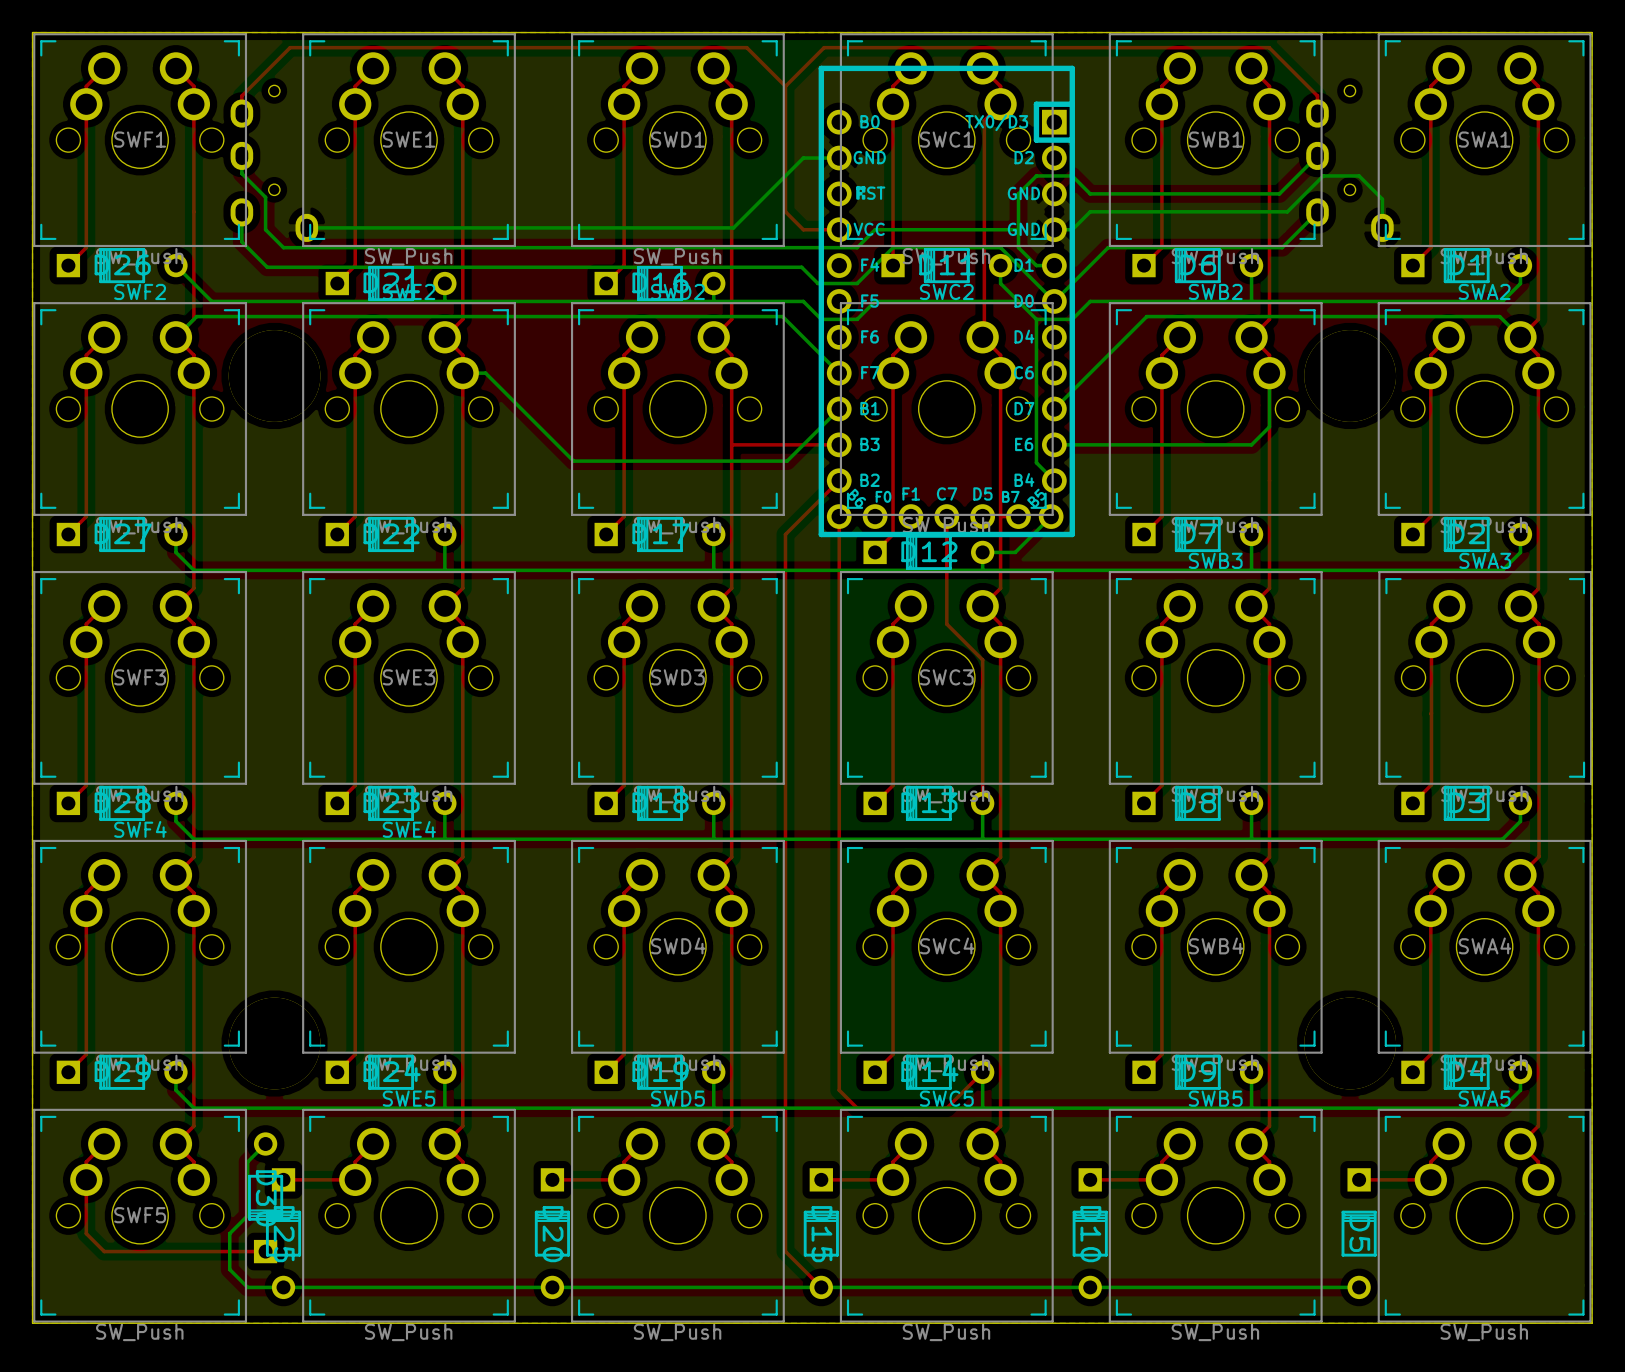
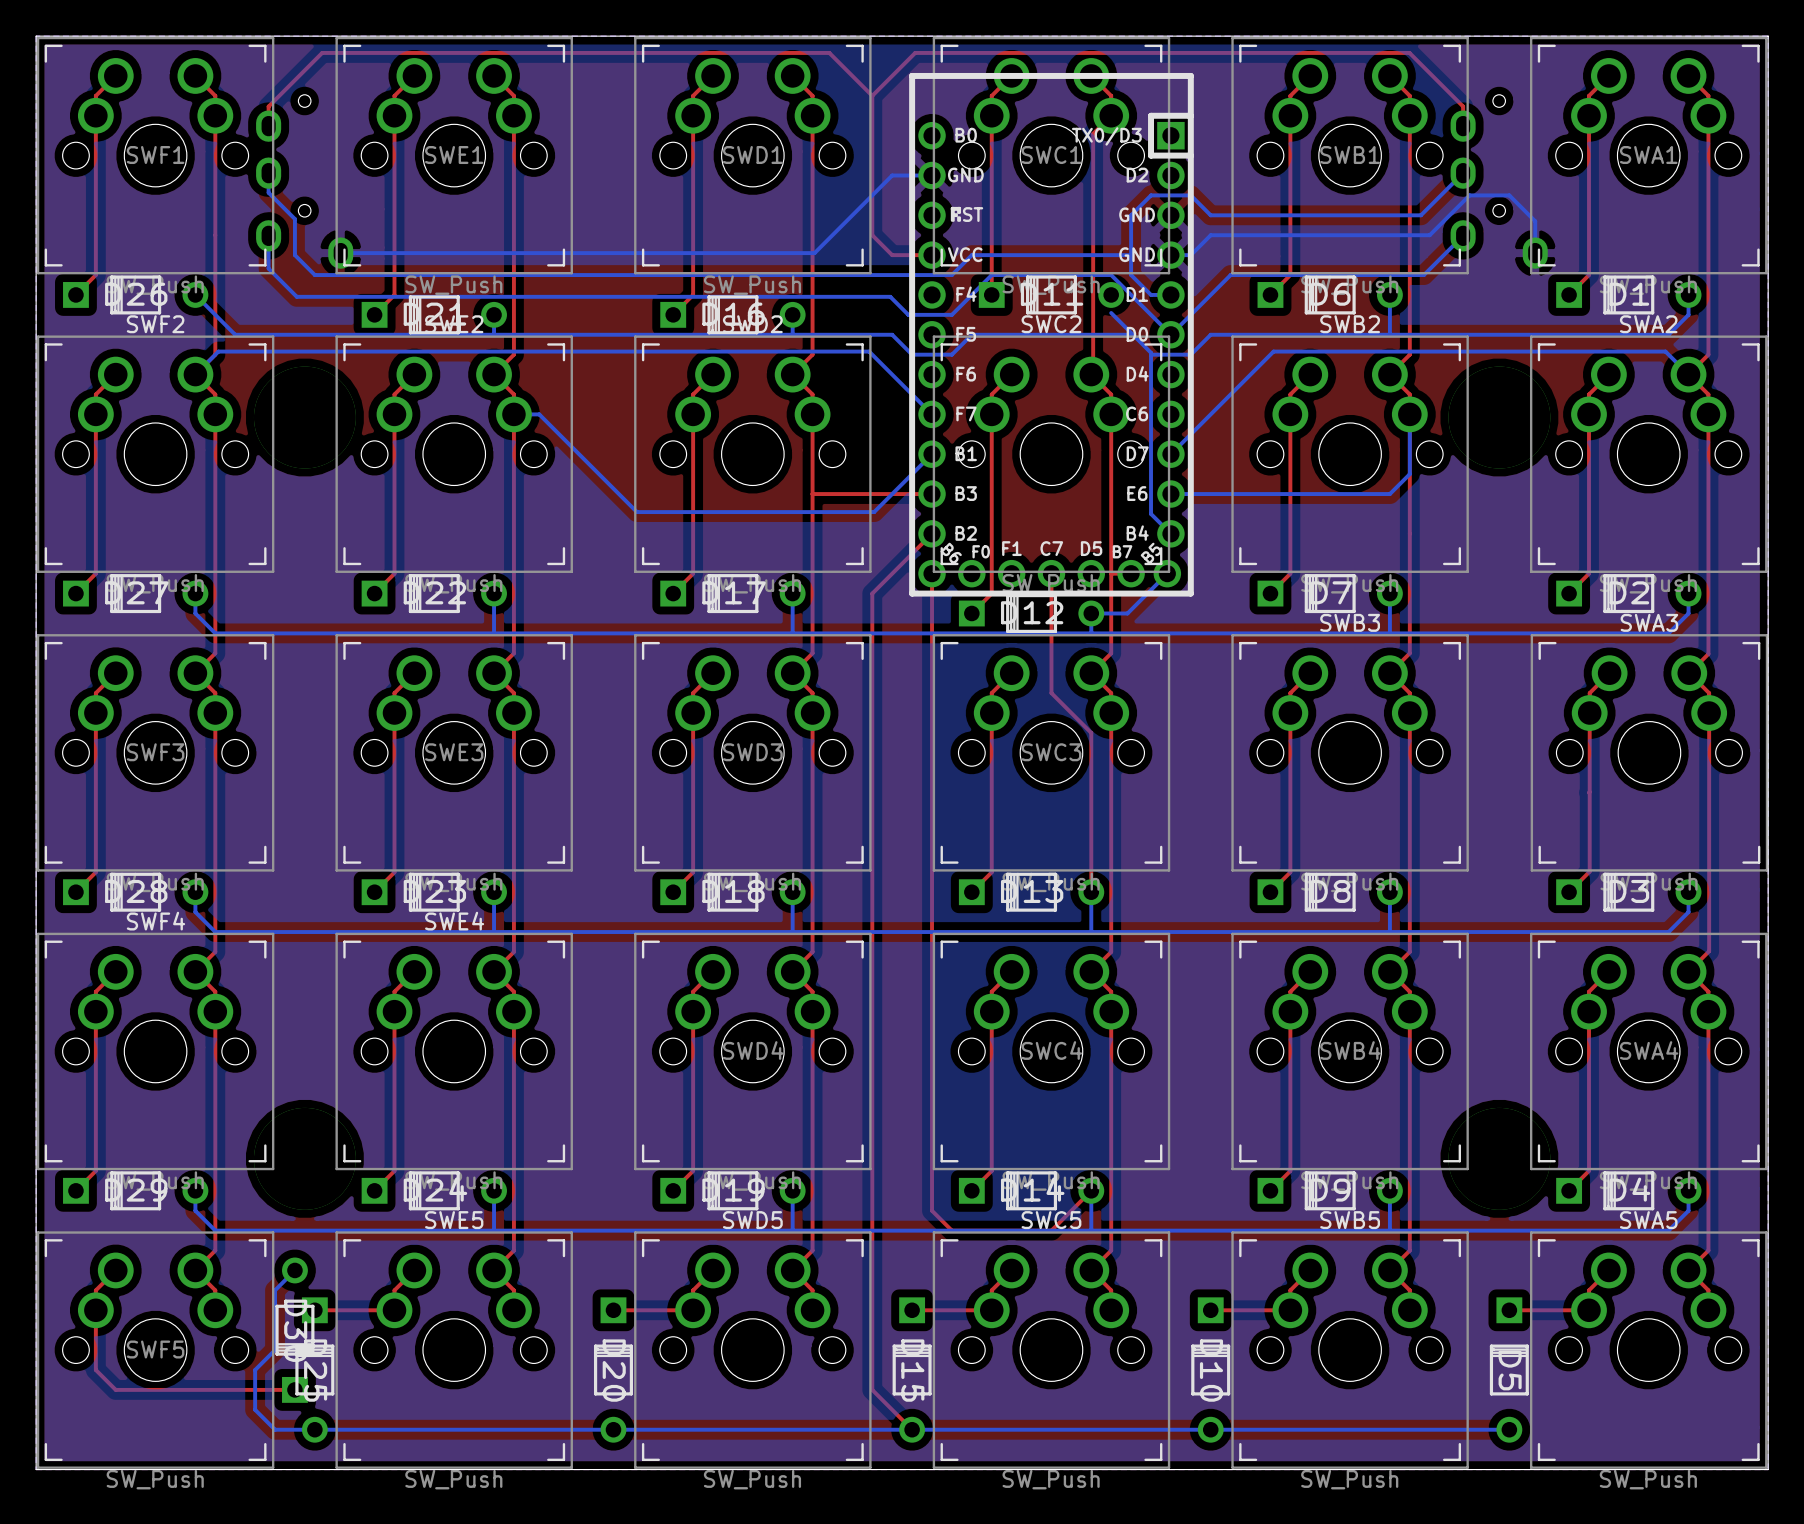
bottom track: (1000, 265) (1000, 283) (1036, 319) -> (1111, 312) (1151, 354)

